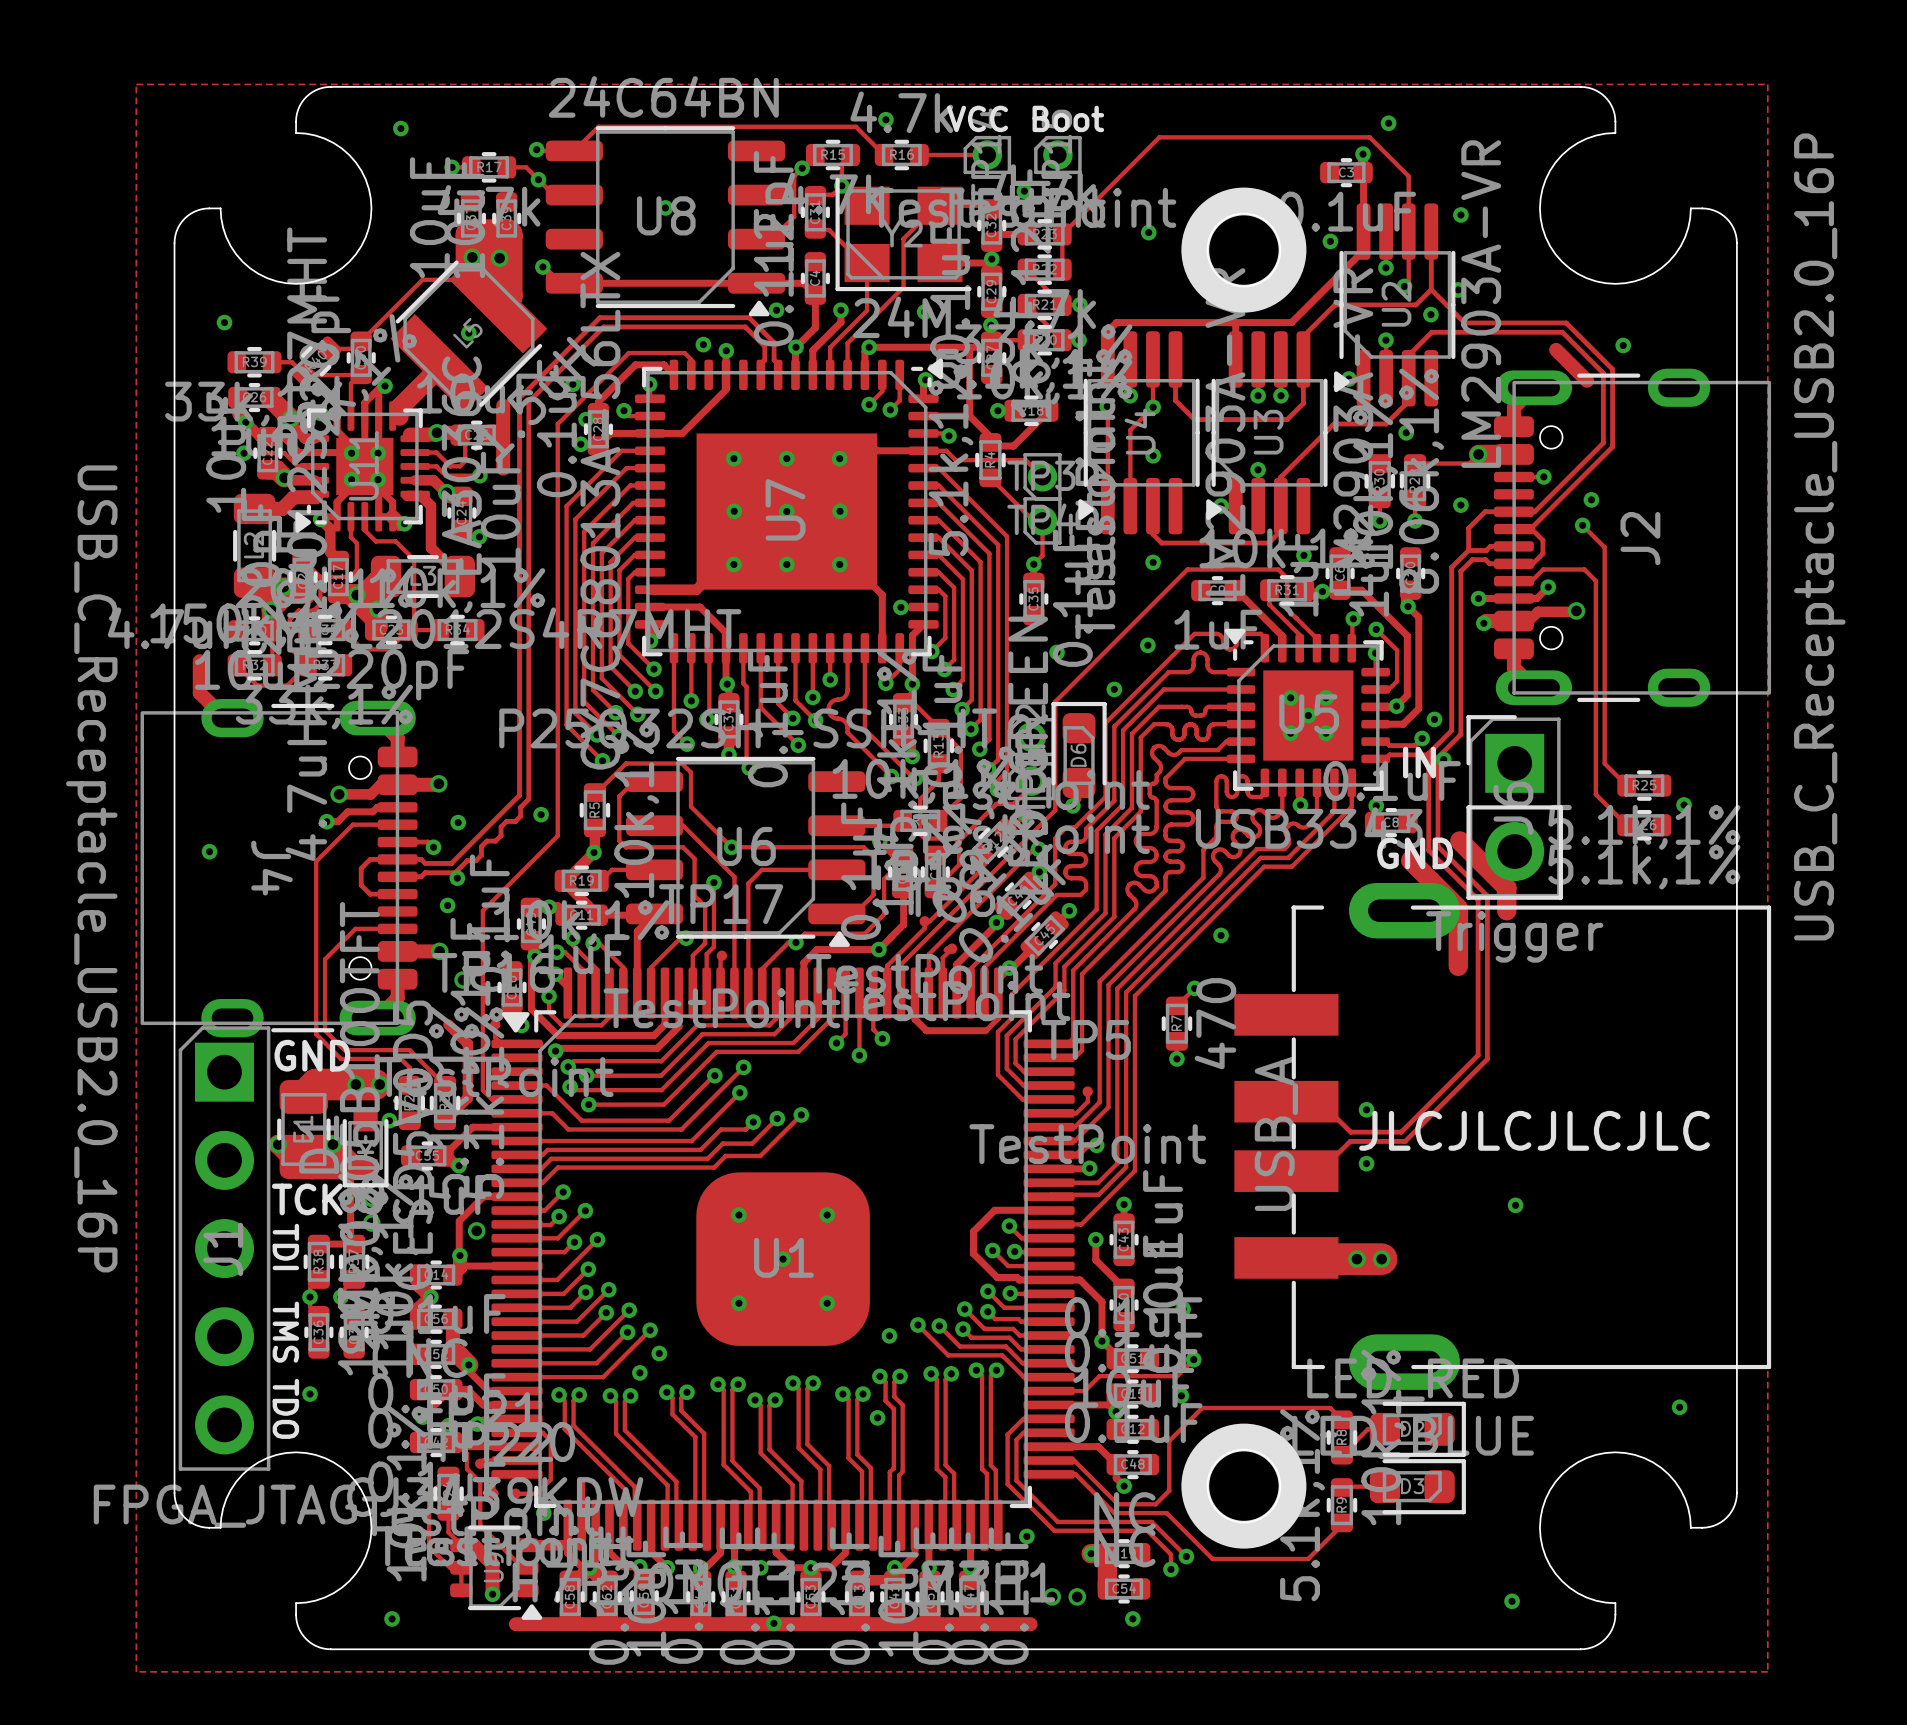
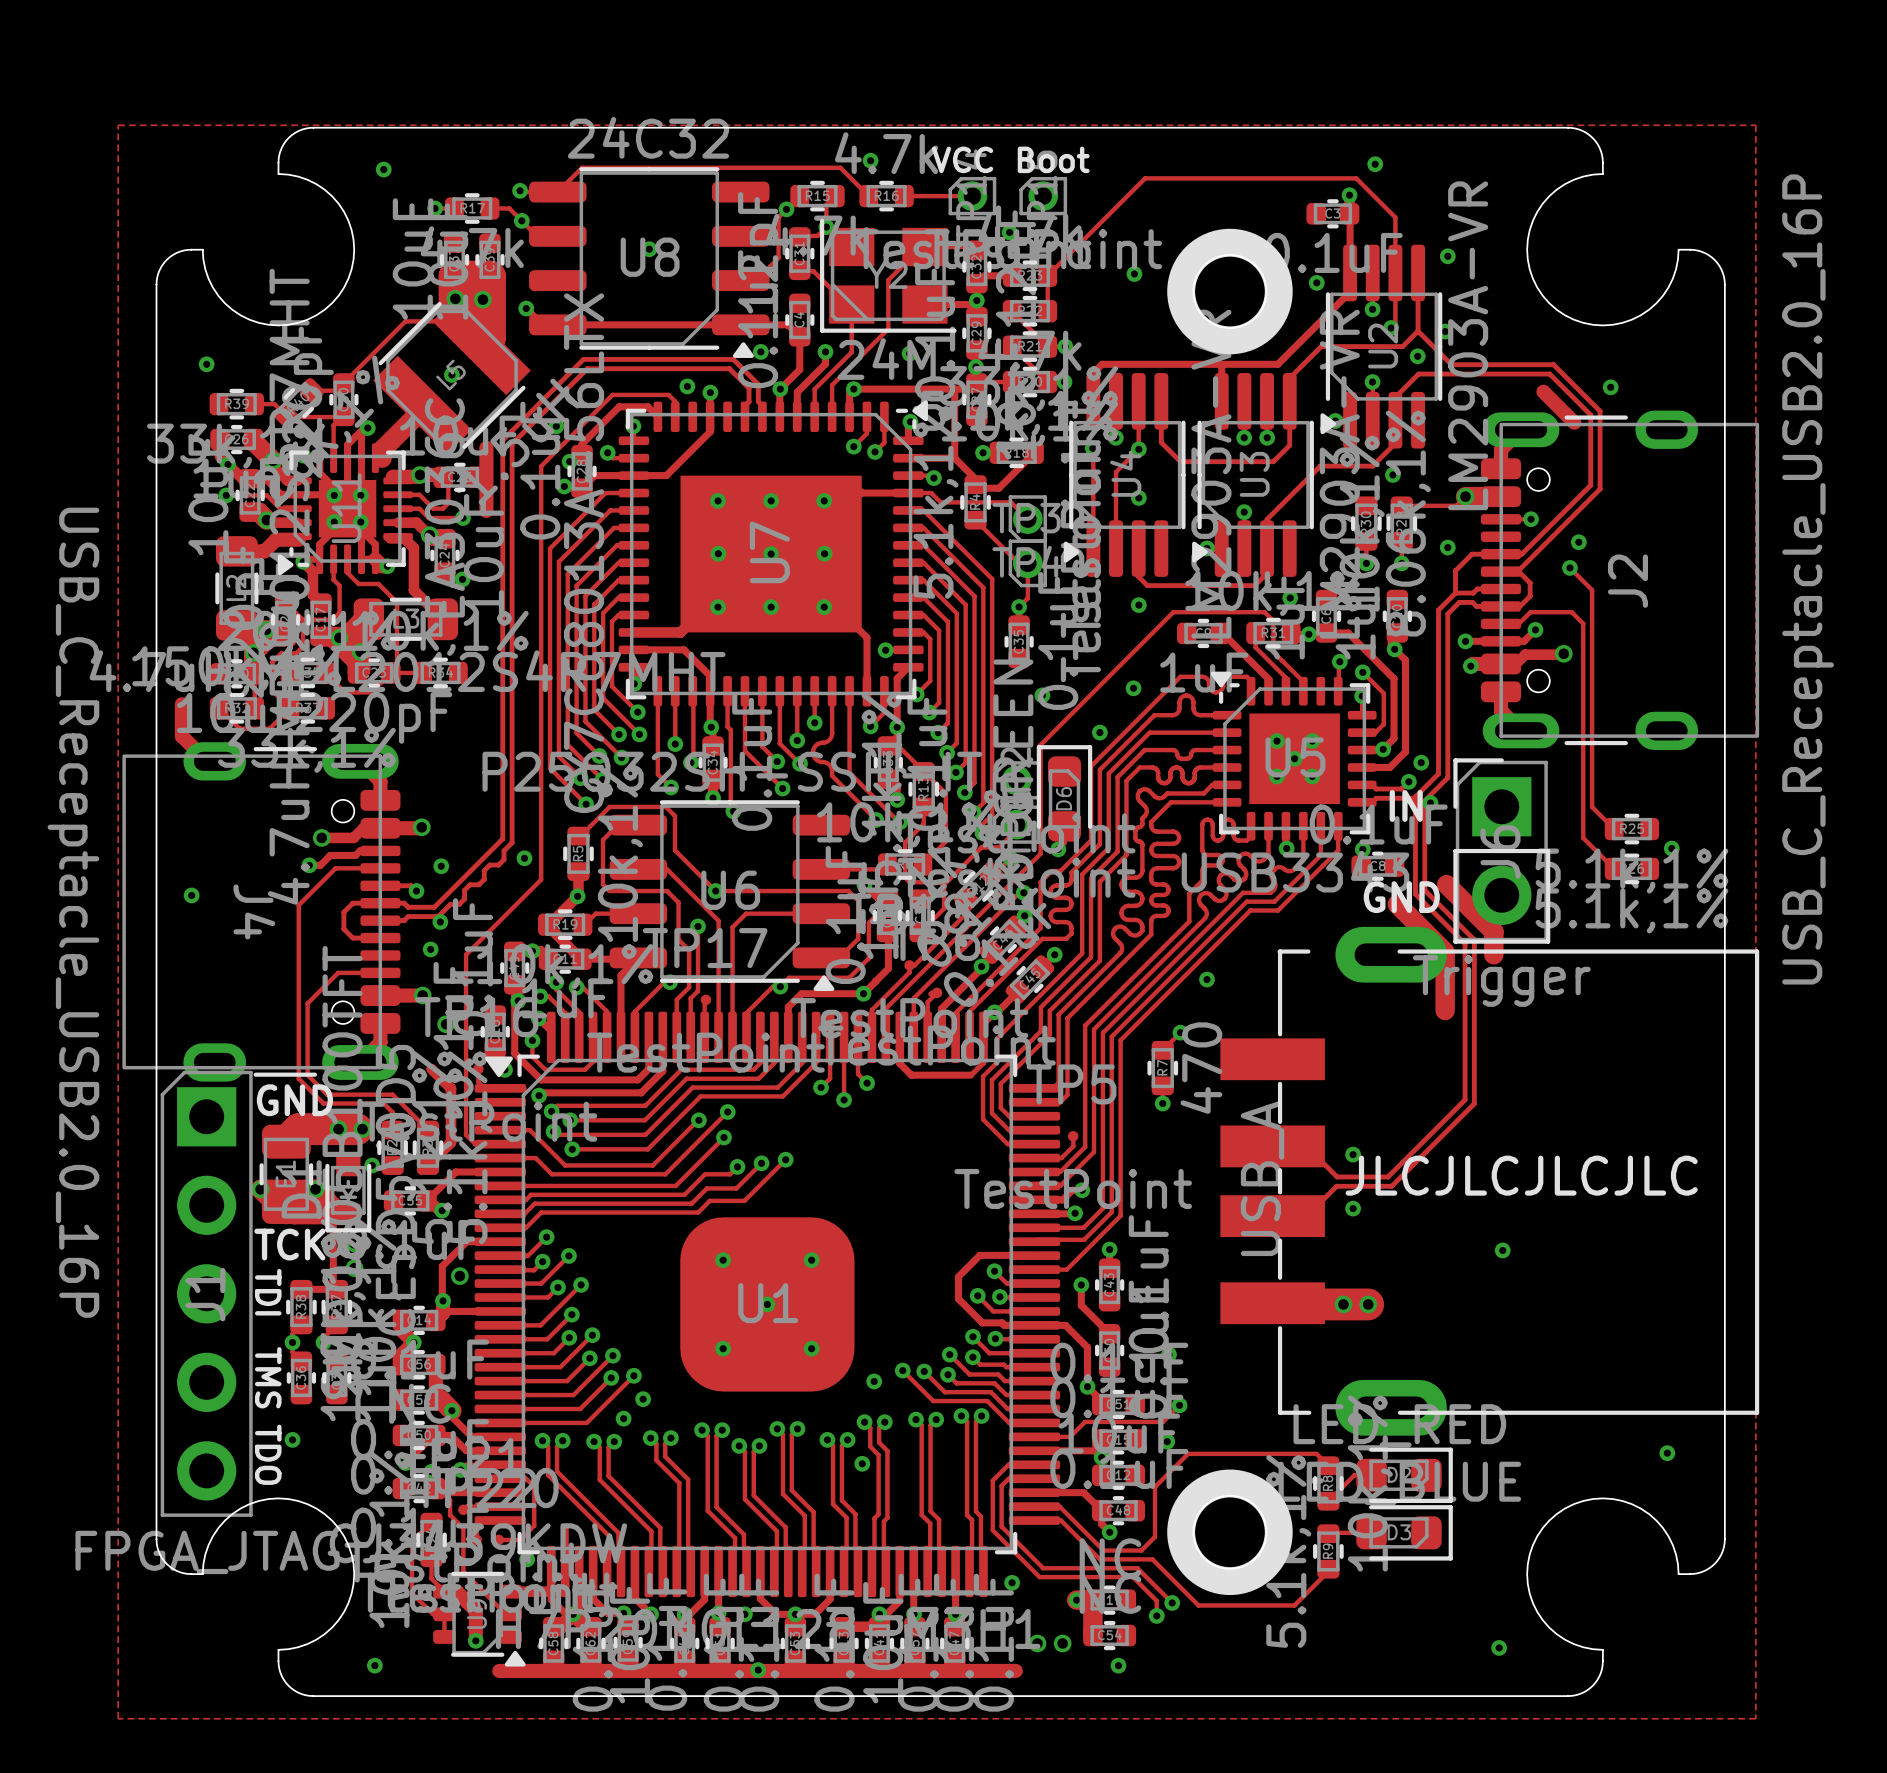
U8 value: 24C64BN (663, 96) -> 24C32 (648, 137)

